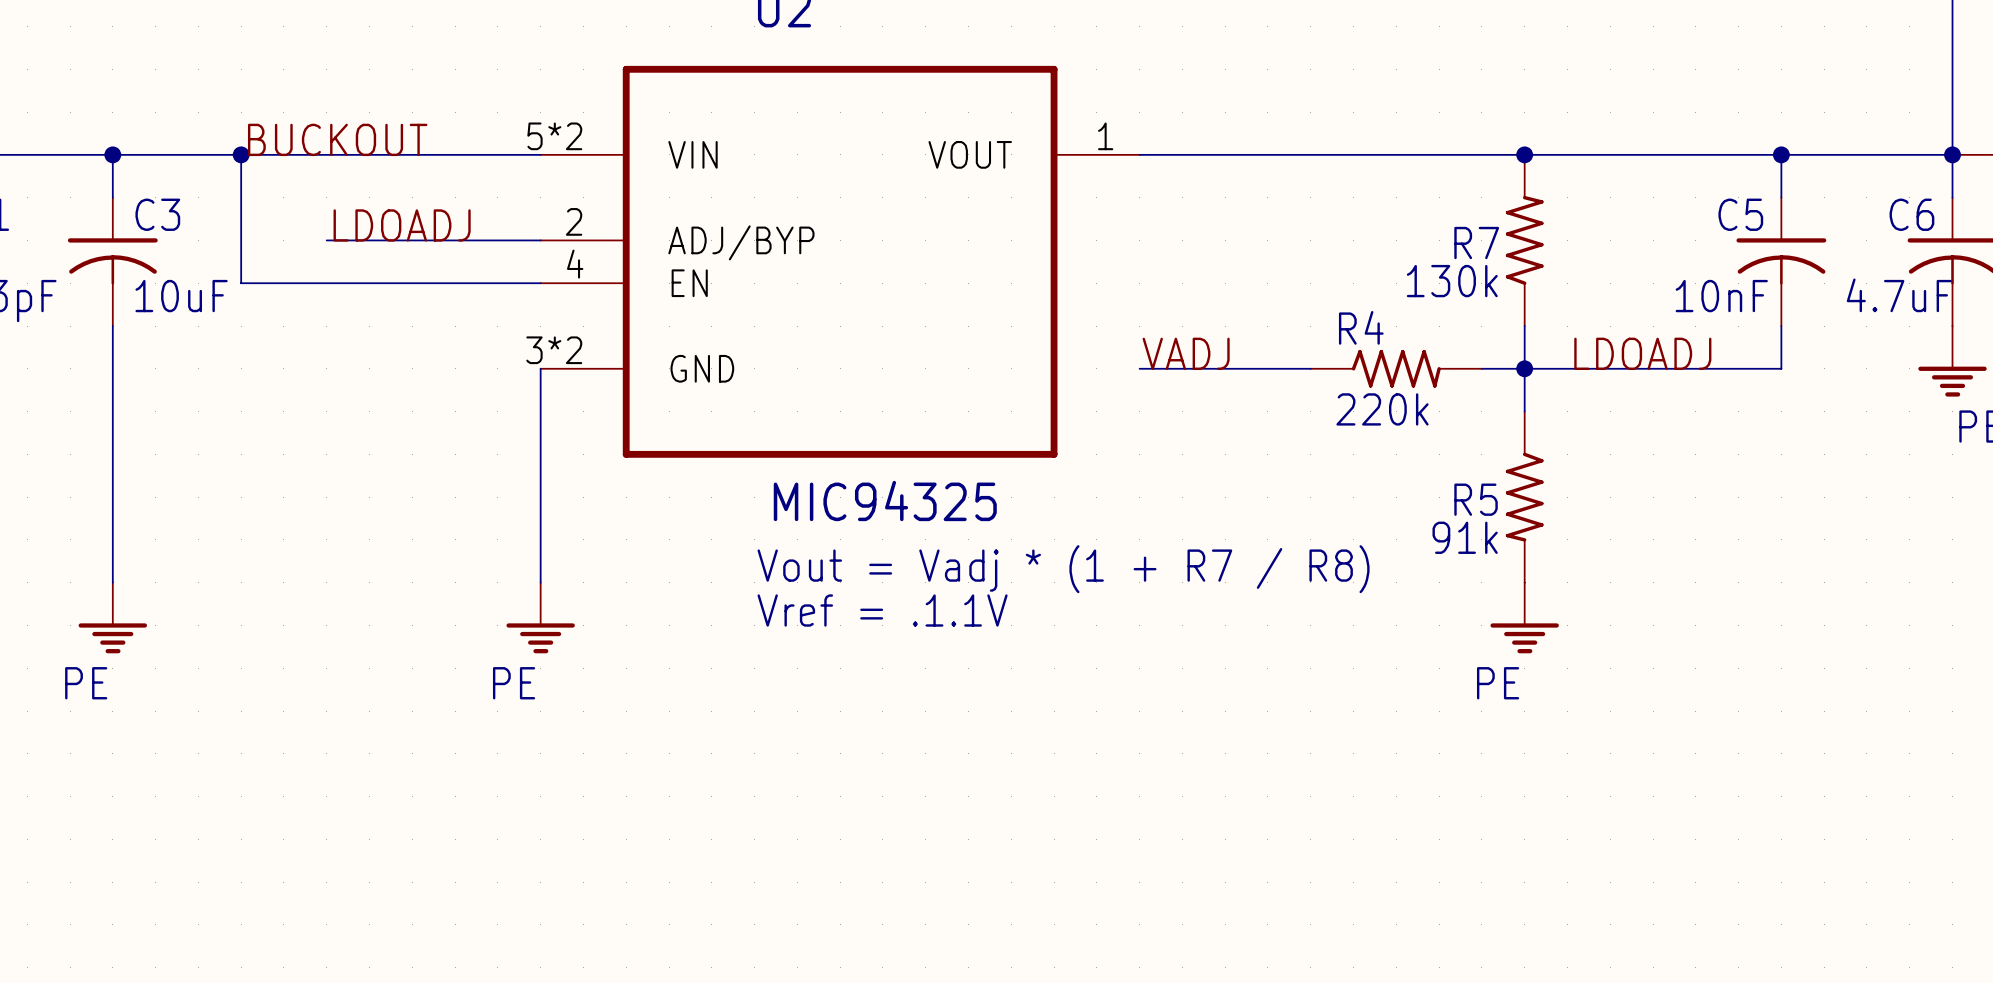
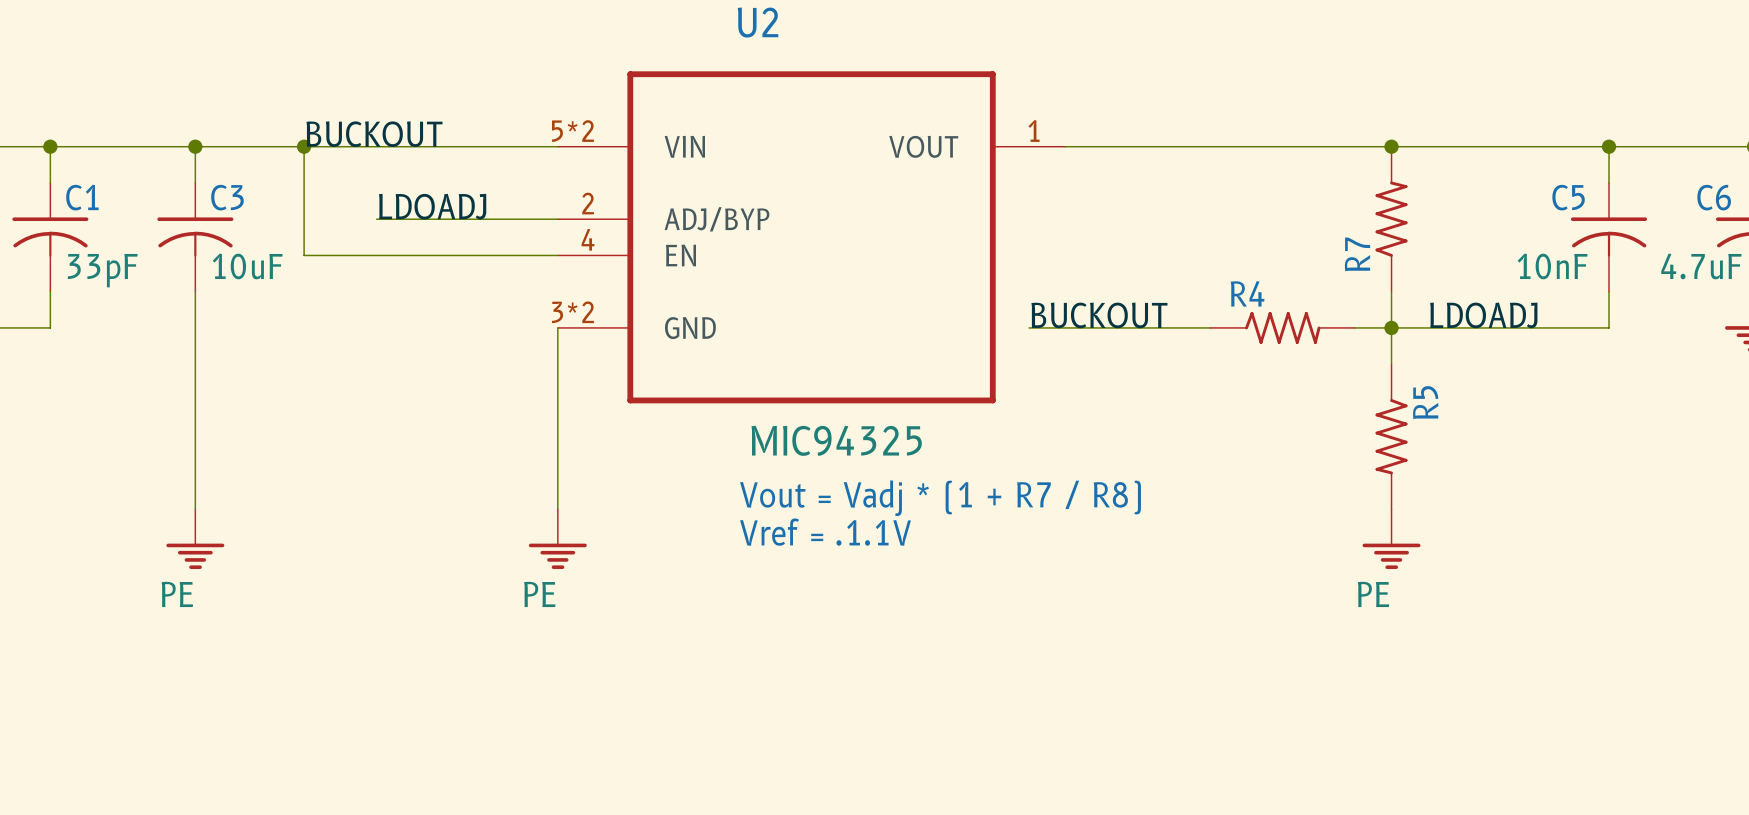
R7 name rotation: 0° (1476, 243) -> 90° counterclockwise (1357, 254)
R7 value: 130k (1452, 281) -> none
label: VADJ (1186, 353) -> none
label: none -> BUCKOUT (1099, 315)
wire: none -> (1029, 327) (1065, 327)
R4 value: 220k (1382, 409) -> none
R5 name rotation: 0° (1476, 499) -> 90° counterclockwise (1425, 402)
R5 name position: R5 (1476, 499) -> R5 (1425, 402)
R5 value: 91k (1465, 537) -> none

